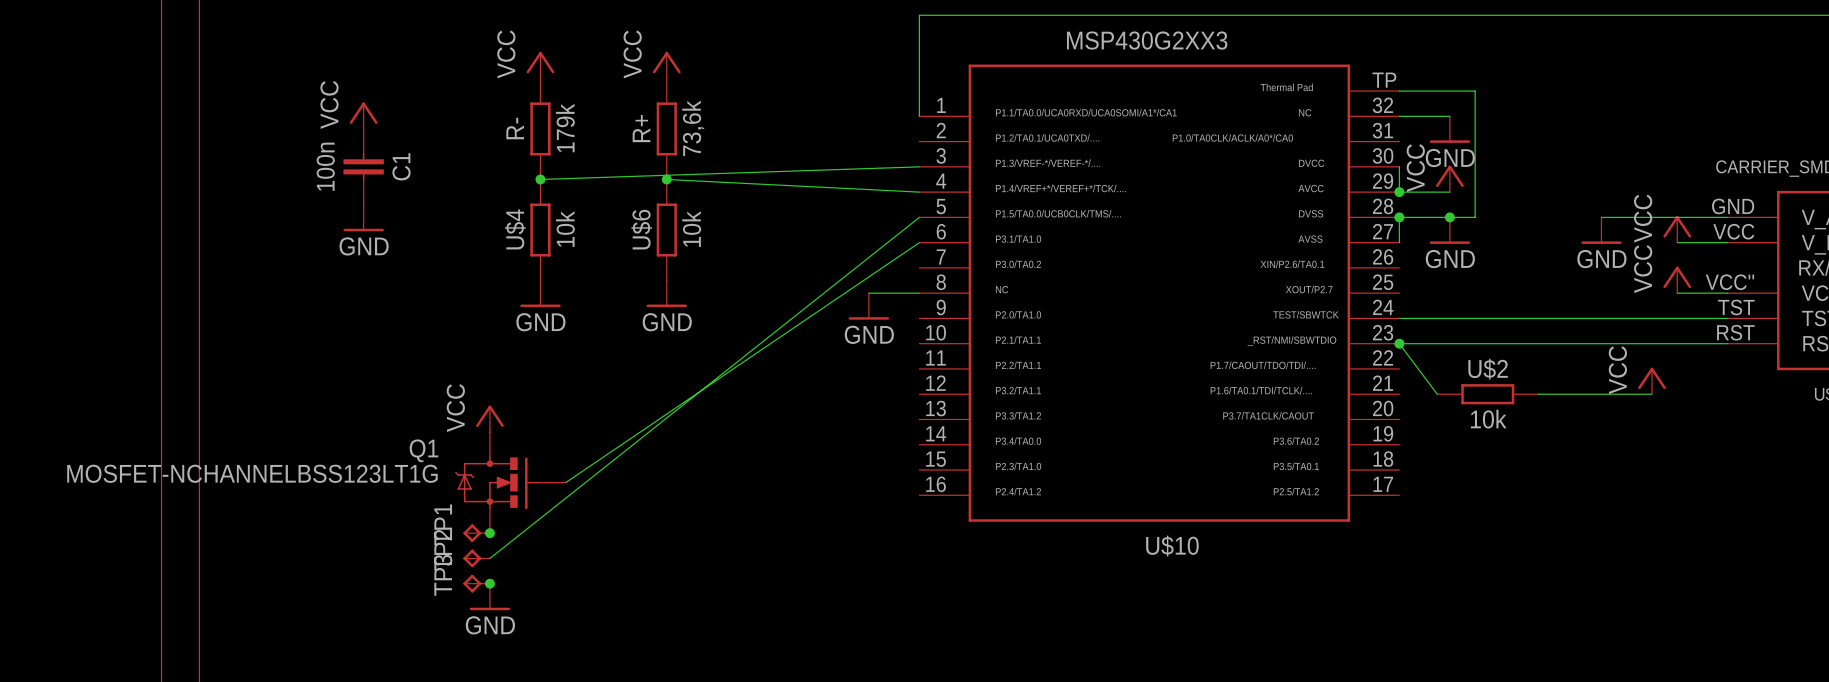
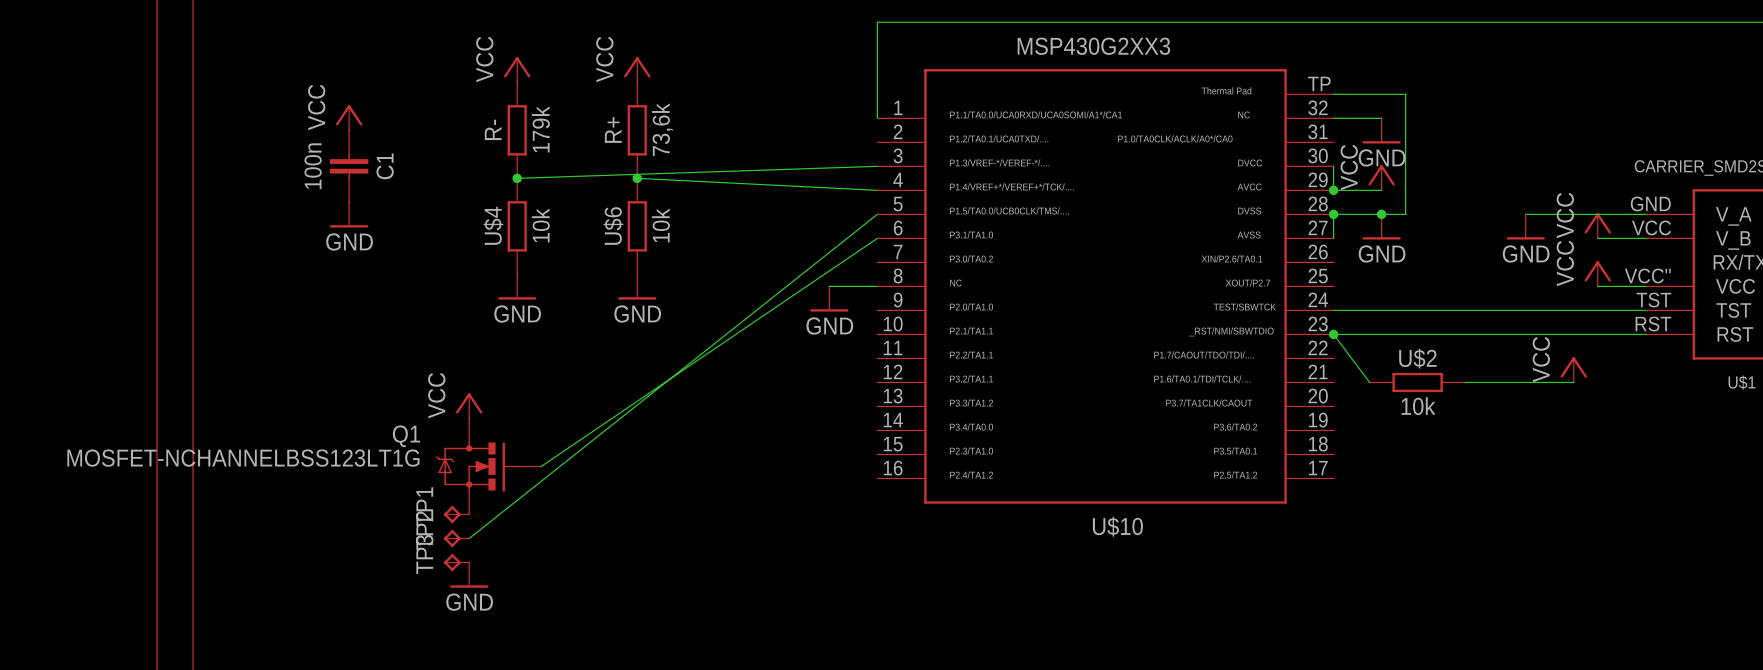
junction: (489, 533) -> none
junction: (489, 583) -> none

